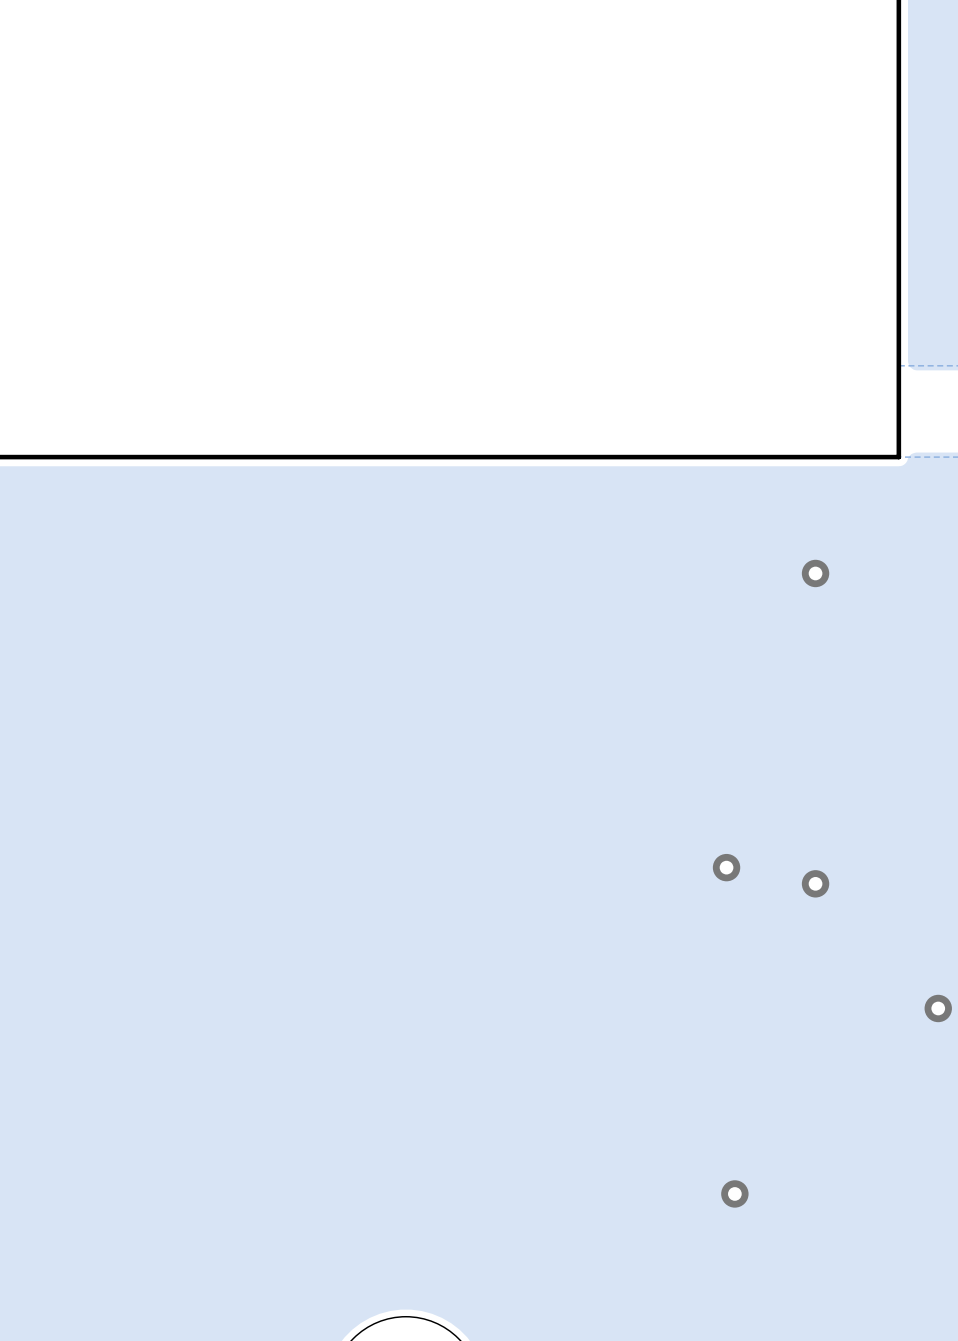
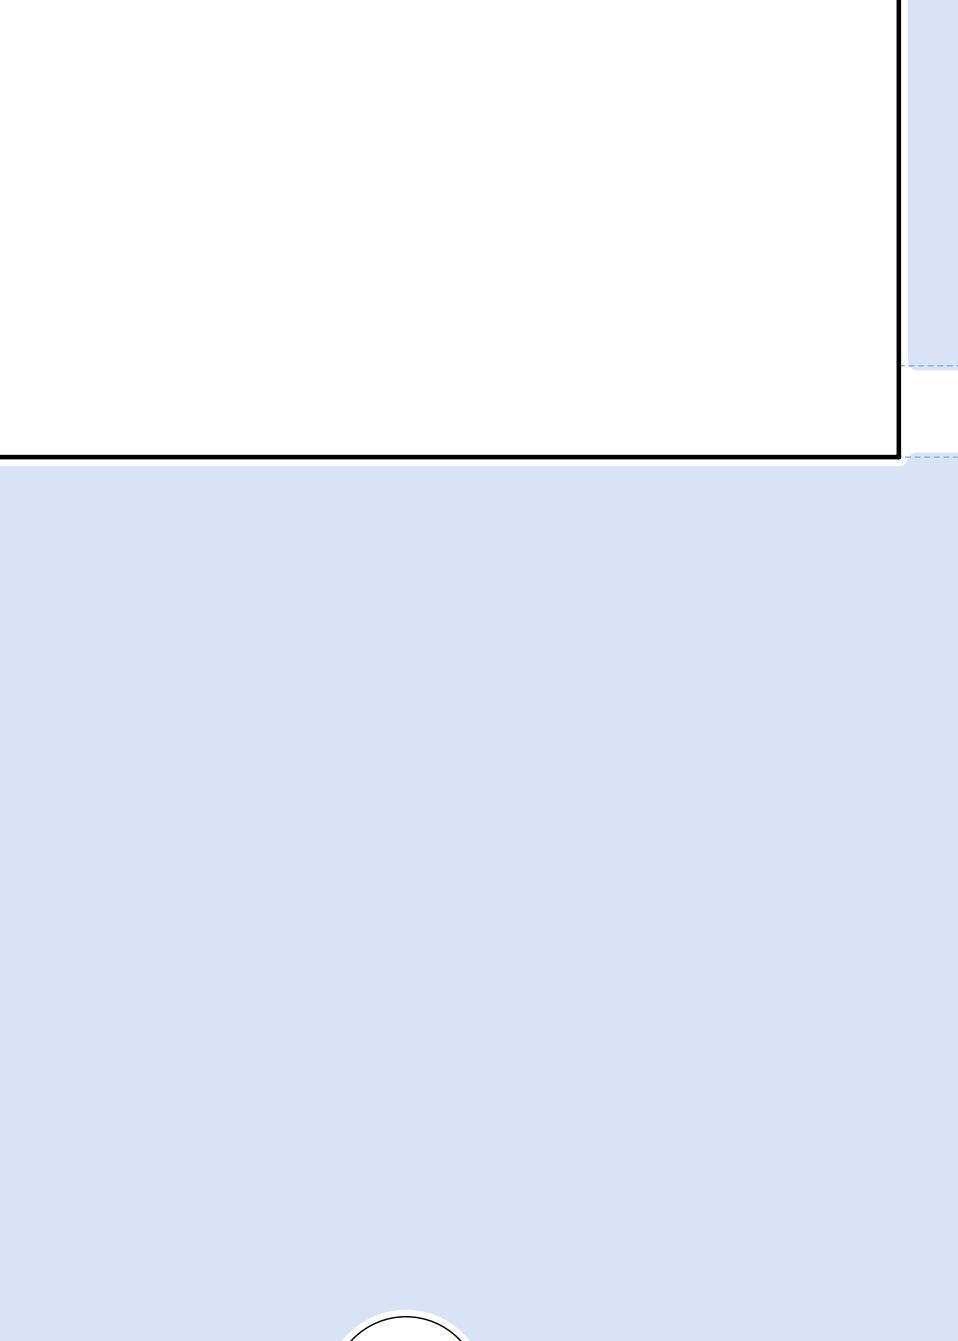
via: (815, 573) -> none
via: (726, 867) -> none
via: (815, 883) -> none
via: (938, 1008) -> none
via: (734, 1193) -> none

